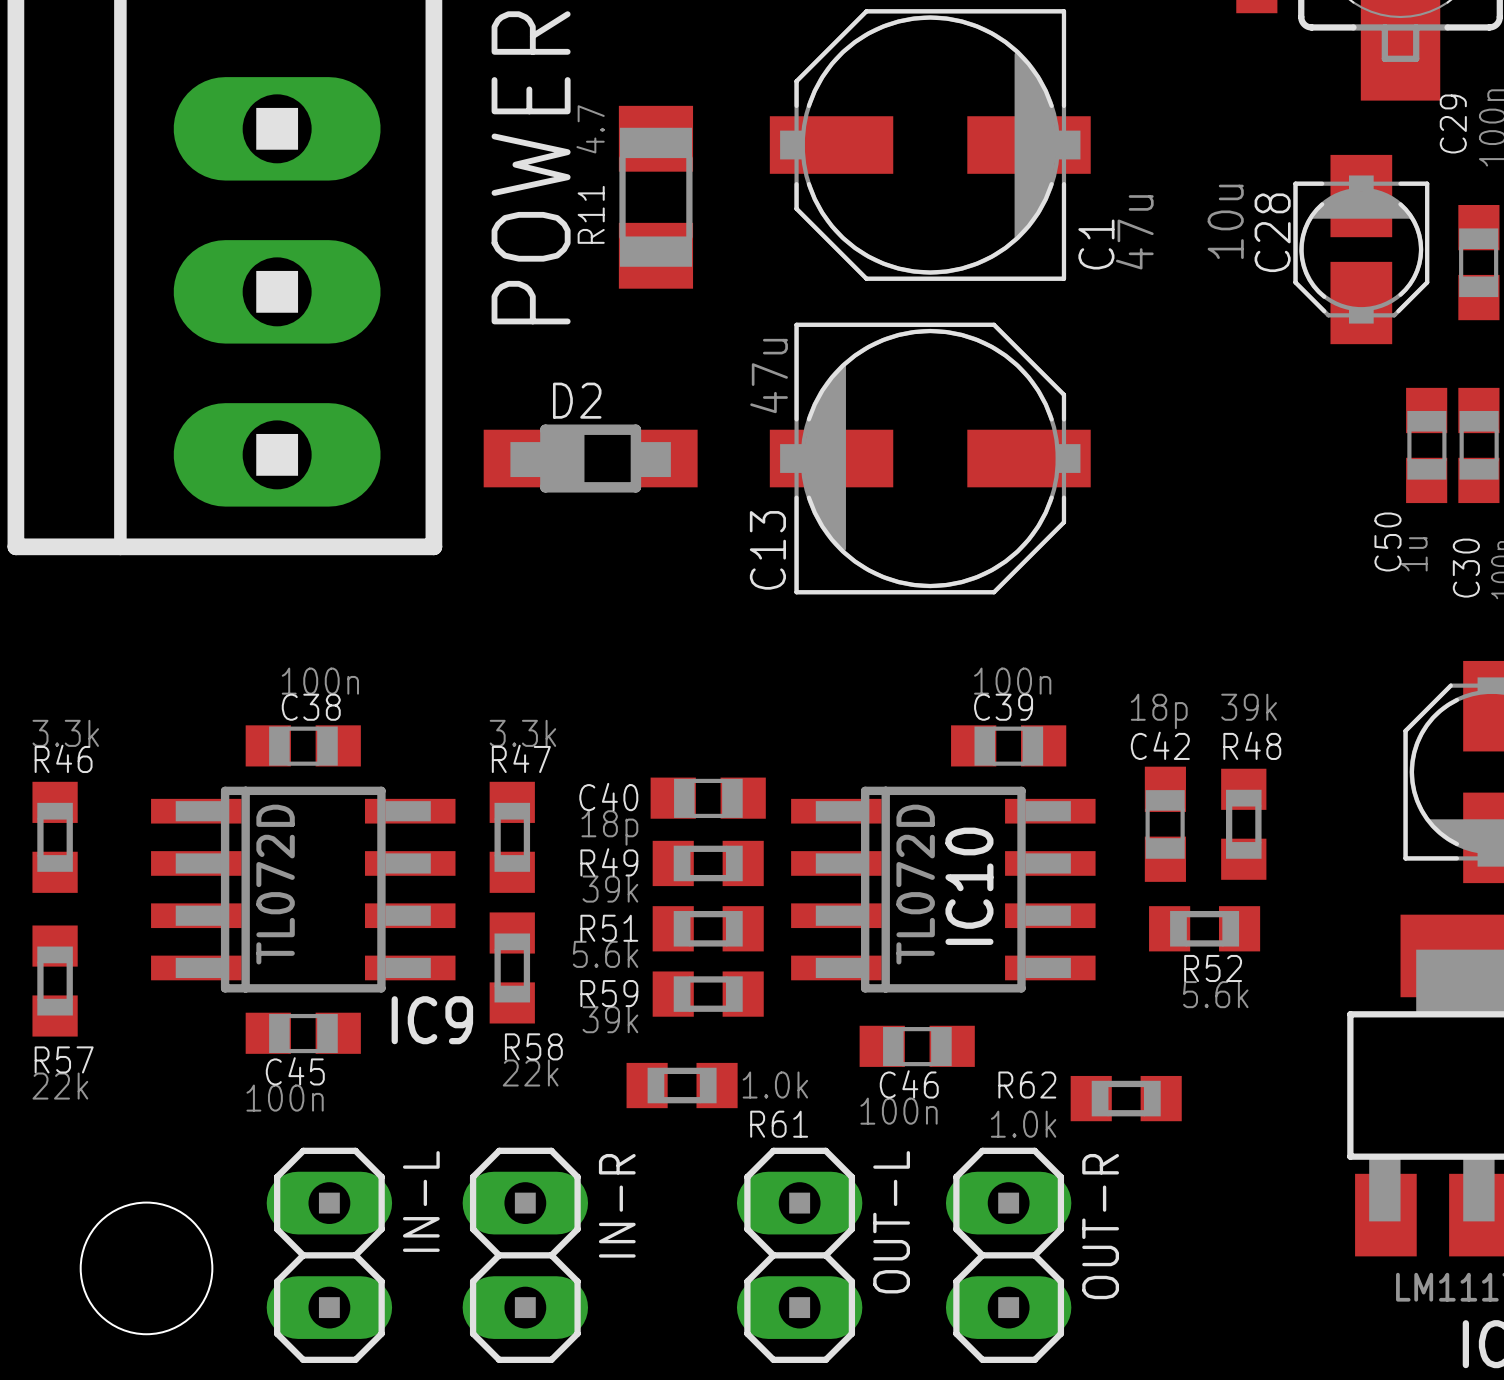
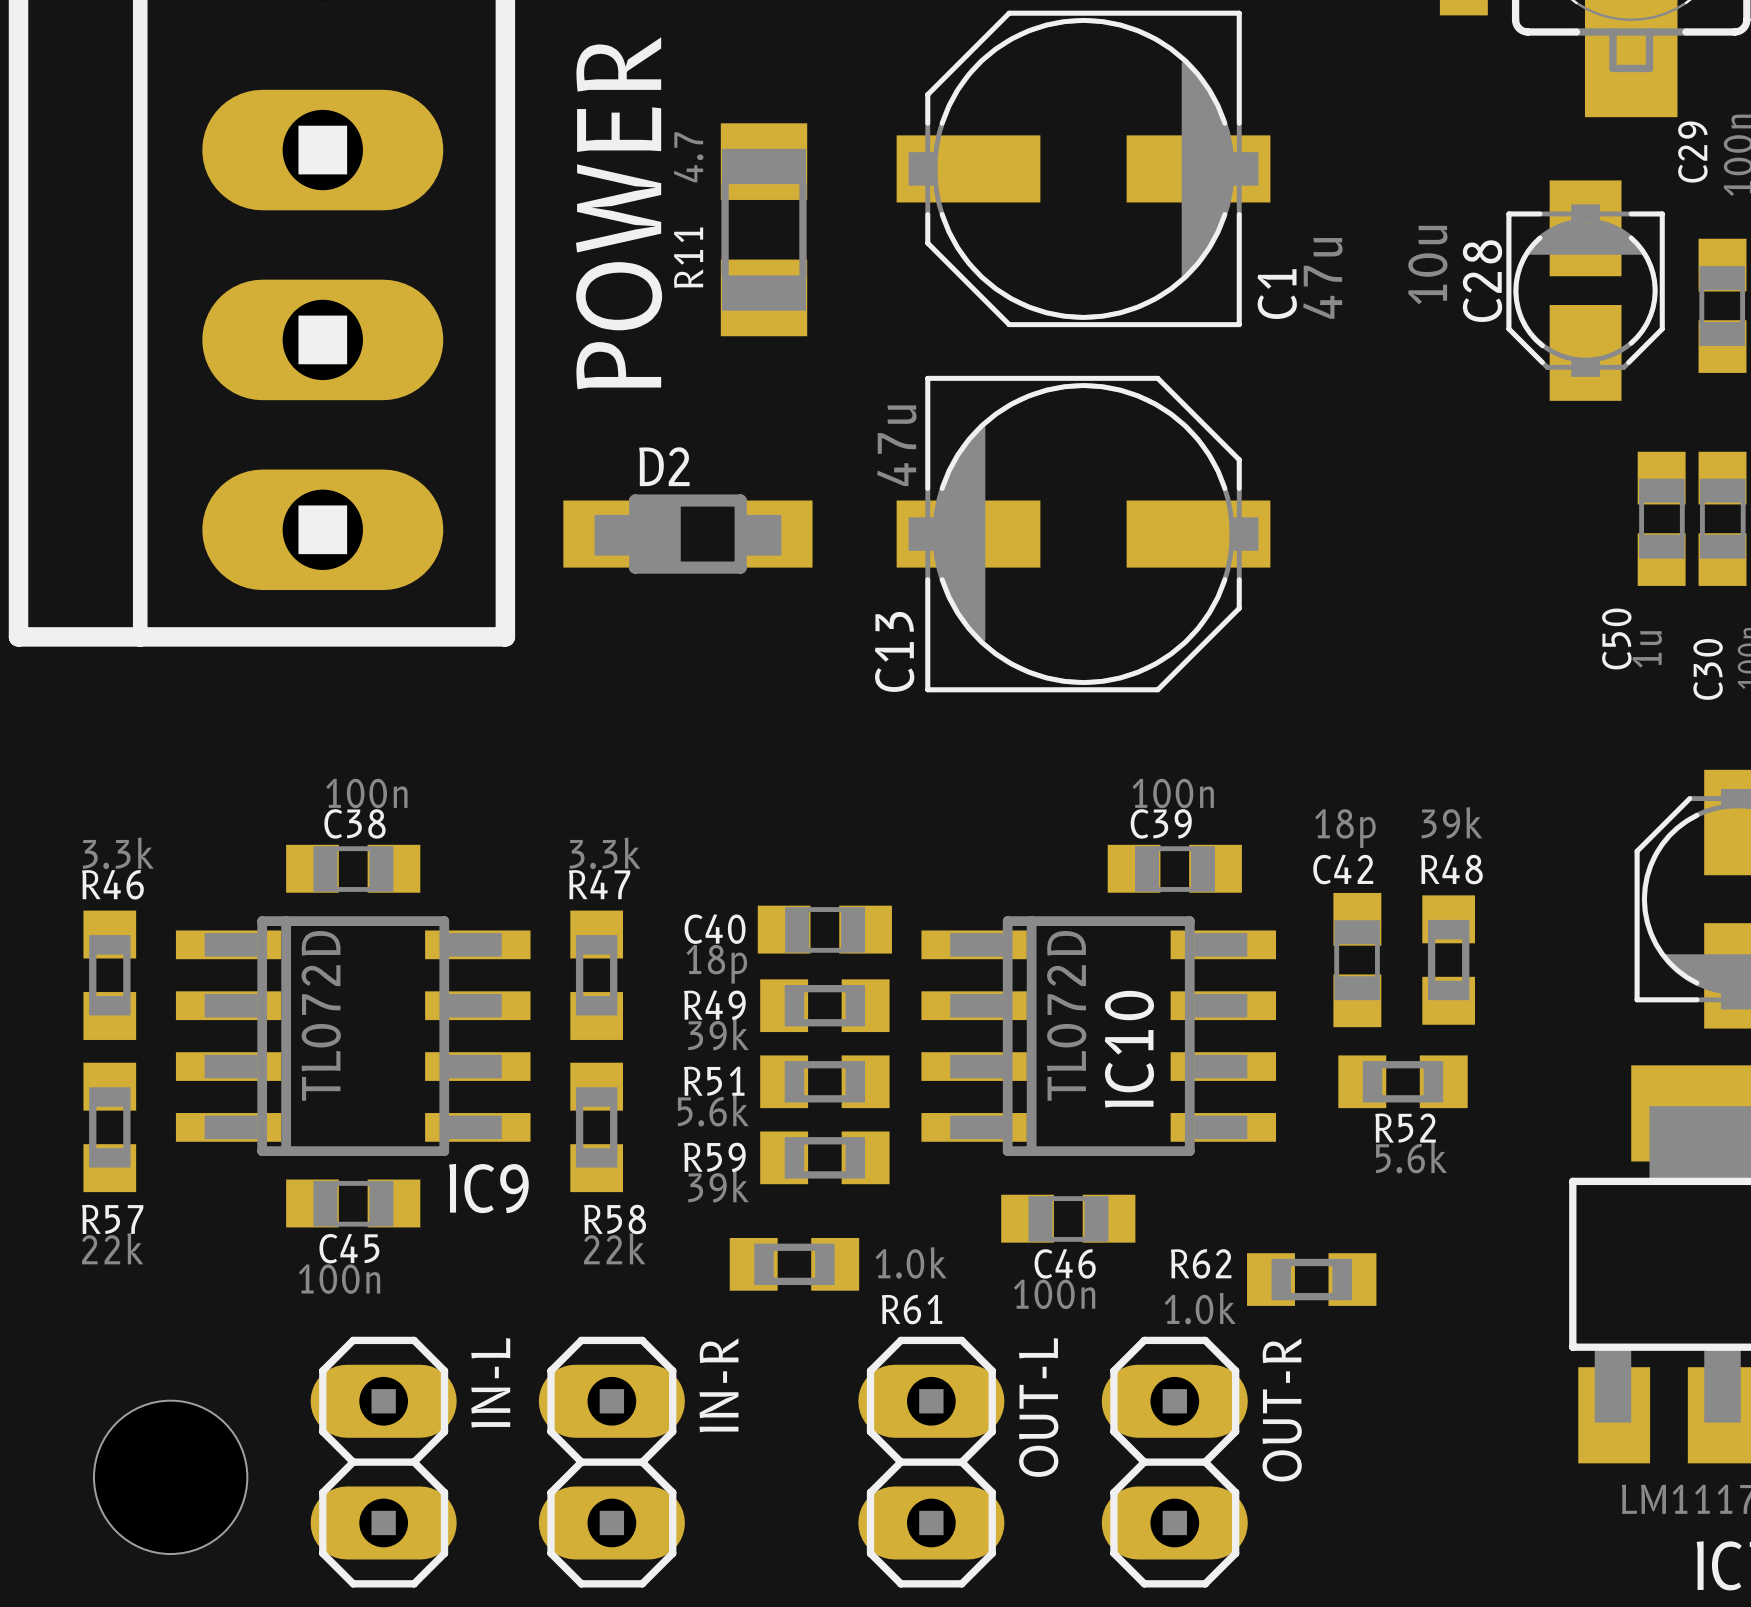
R46 position: (55, 837) -> (109, 975)
R57 position: (55, 981) -> (109, 1127)

